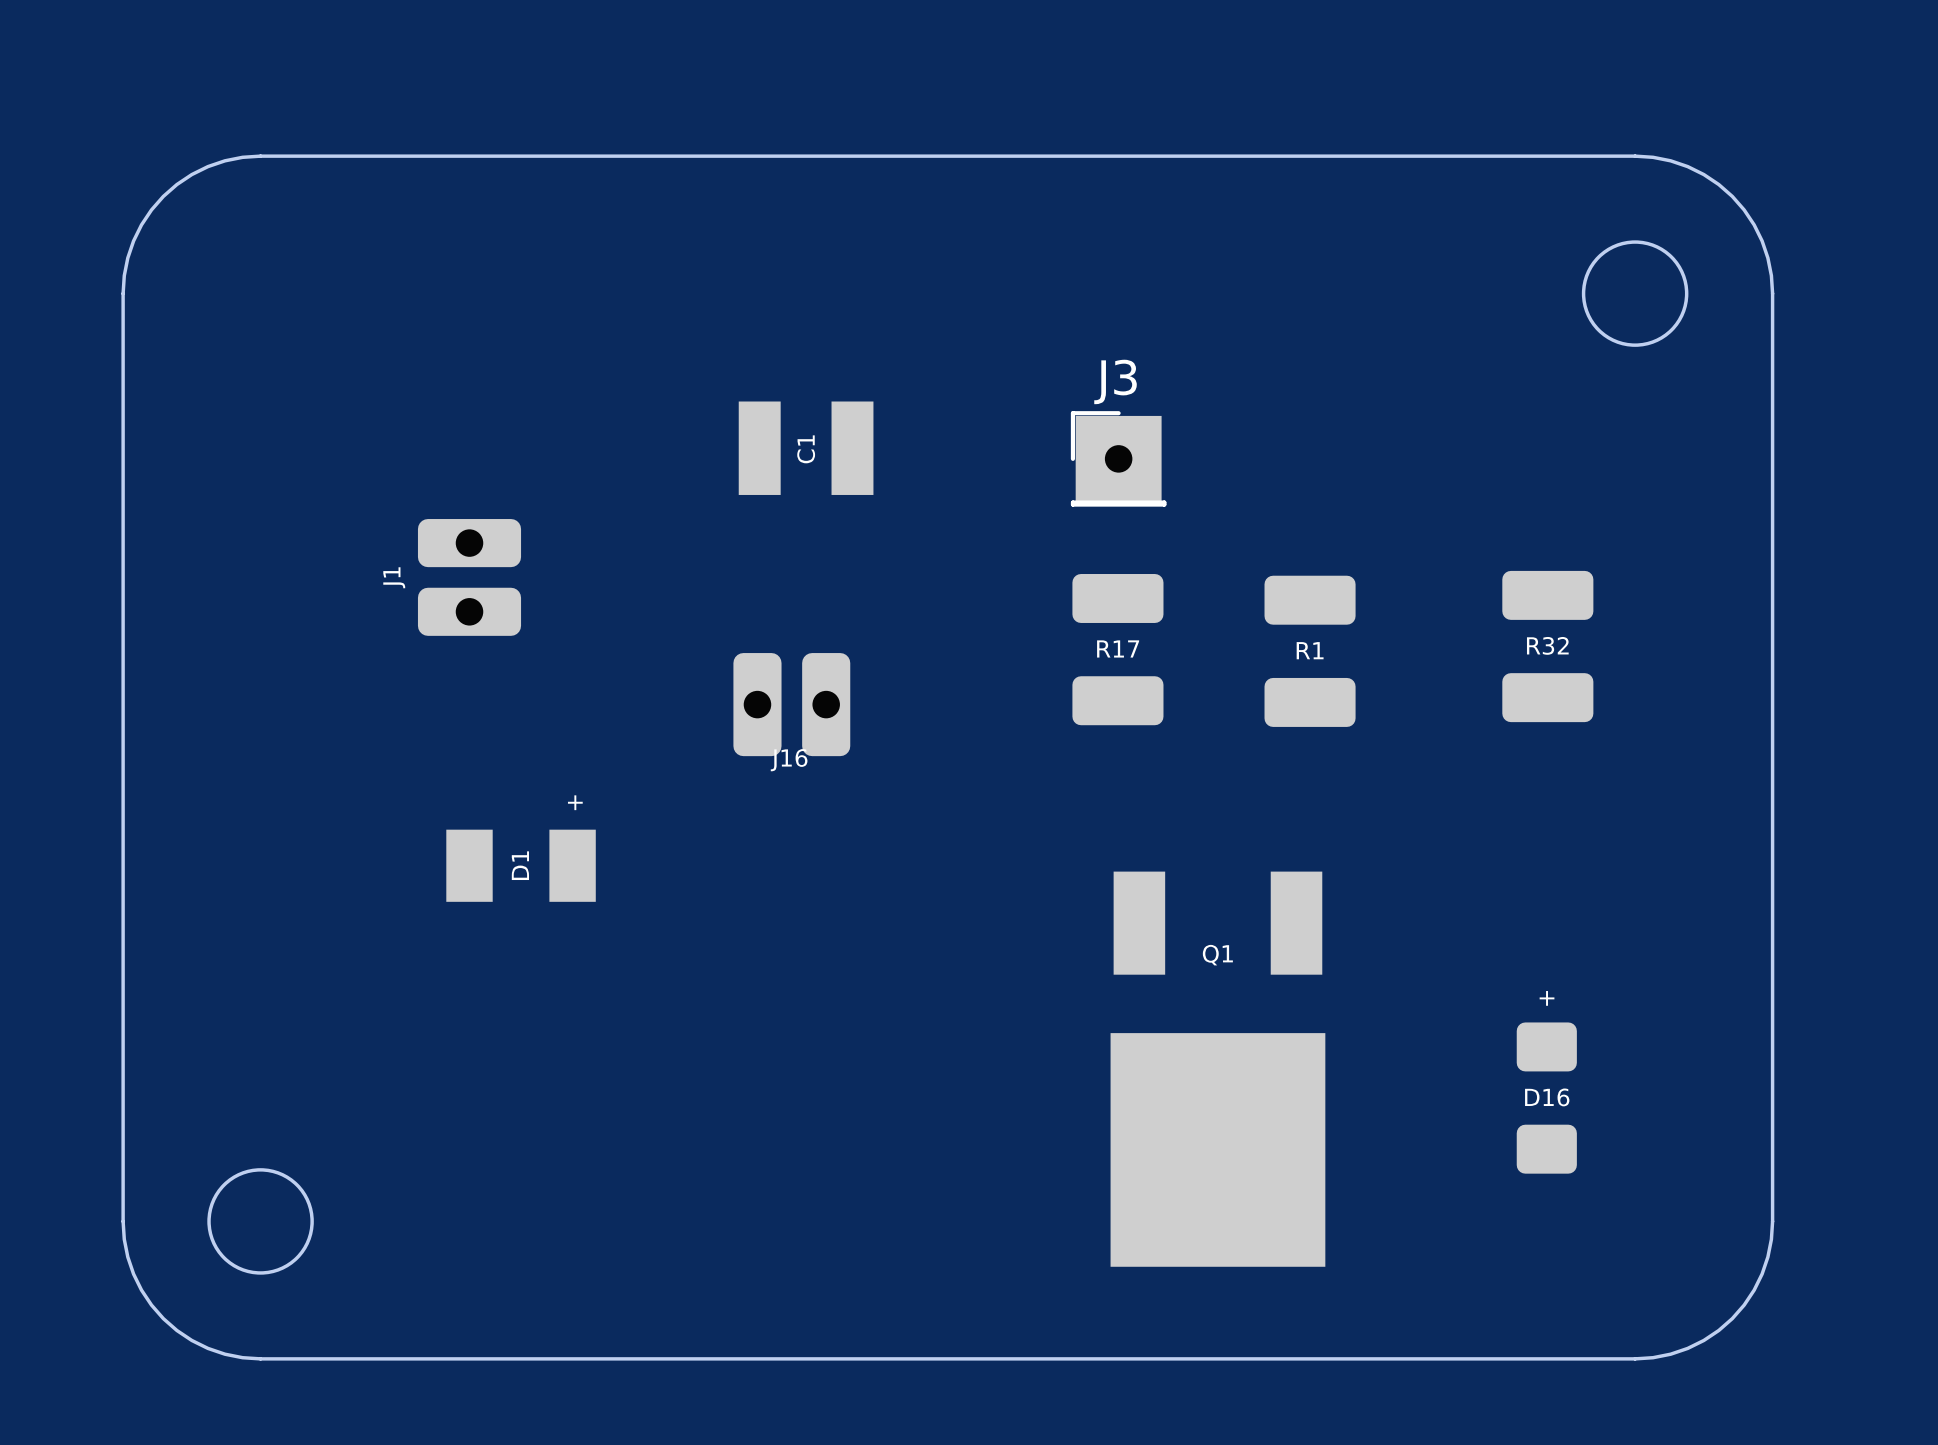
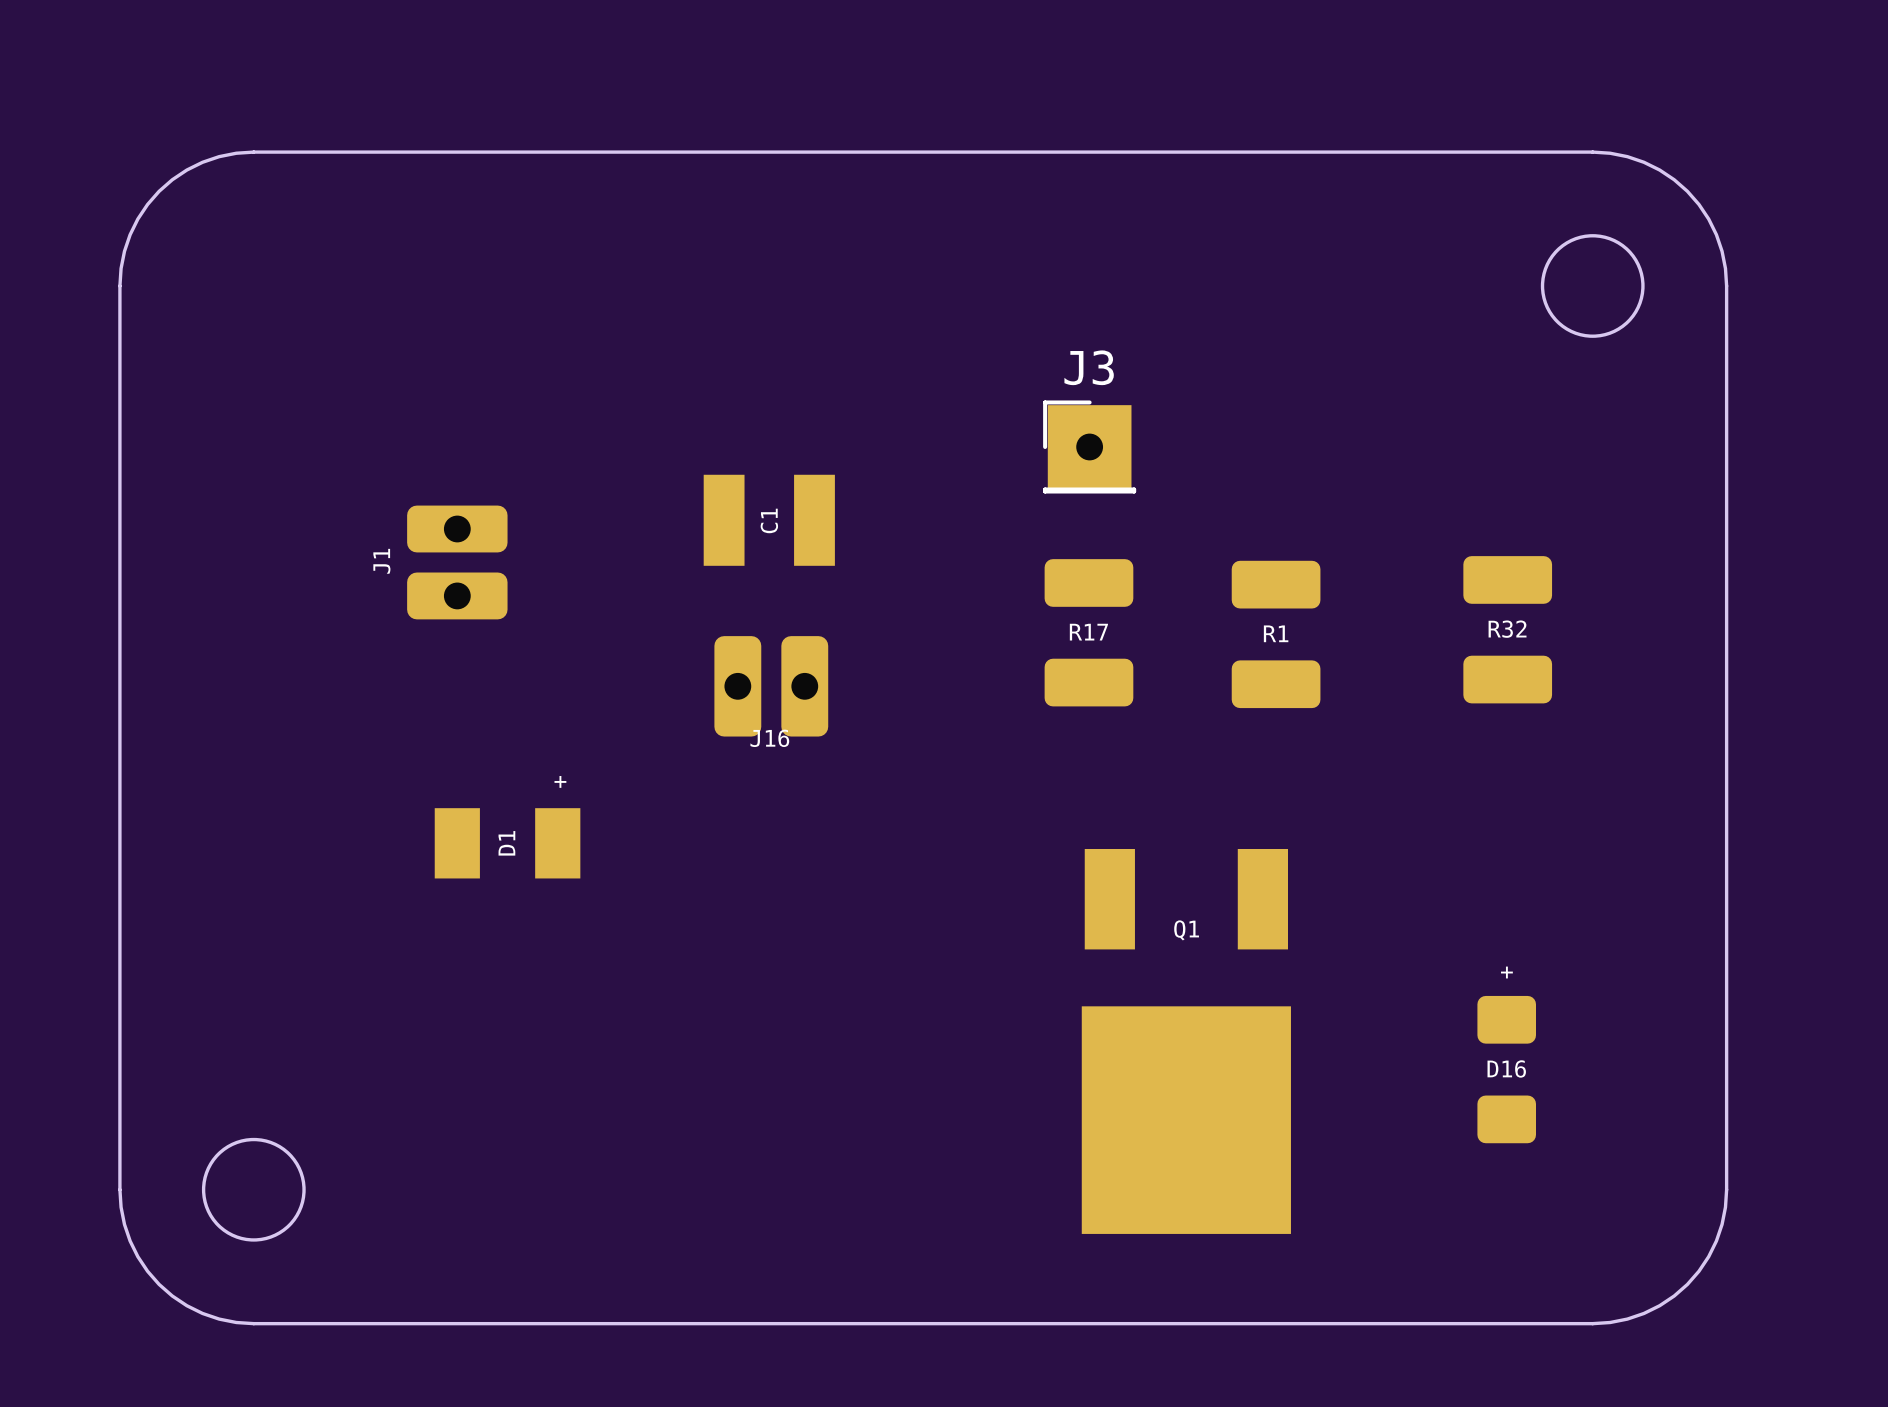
C1 position: (806, 448) -> (769, 520)

